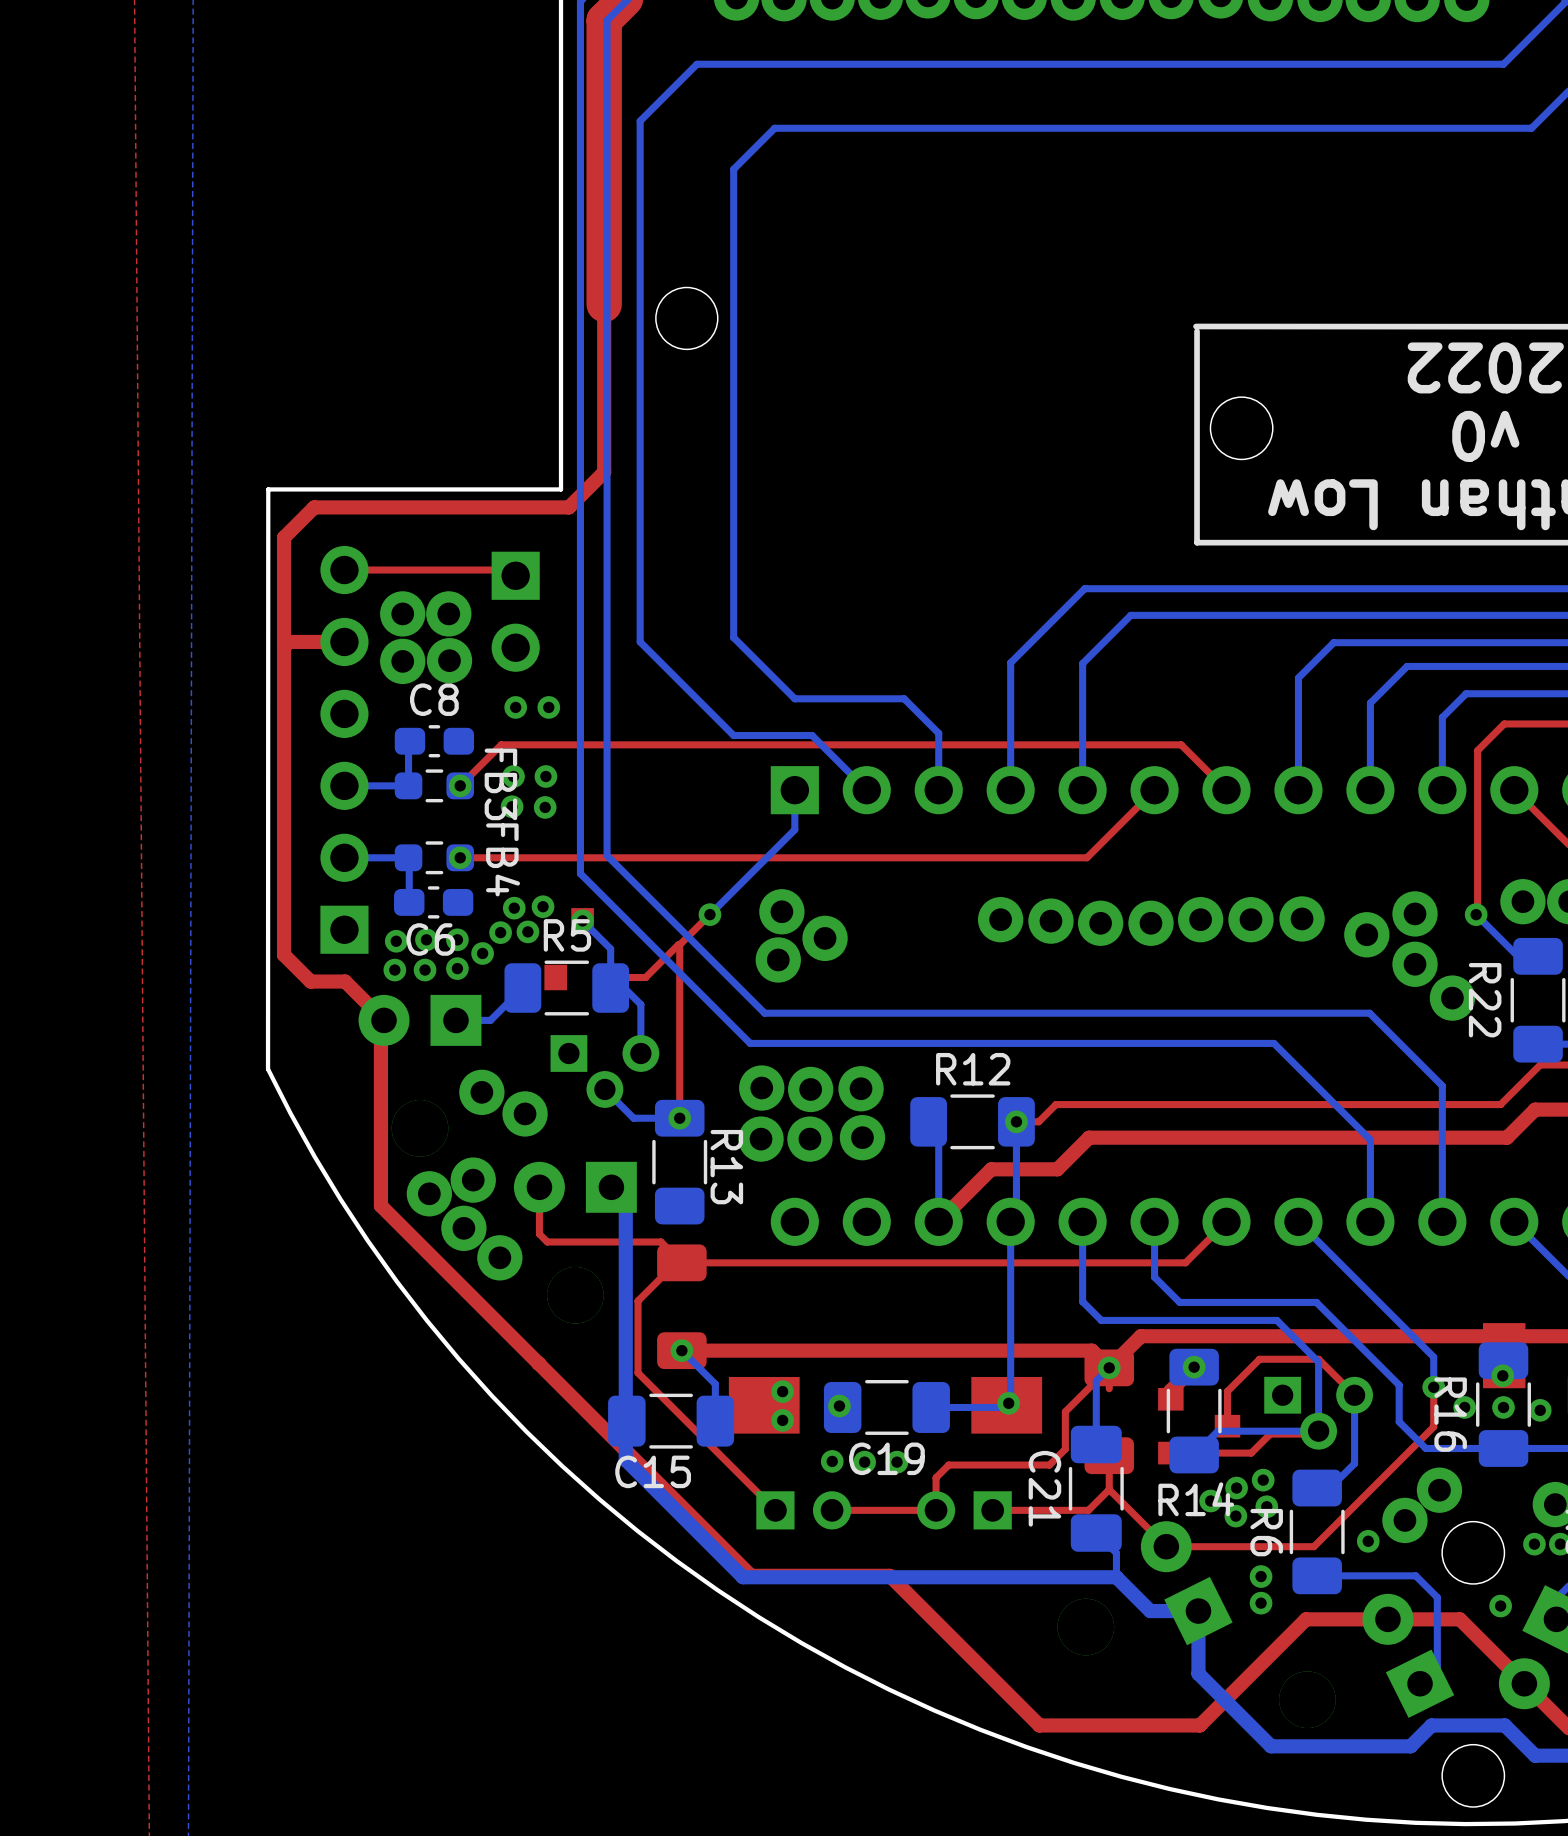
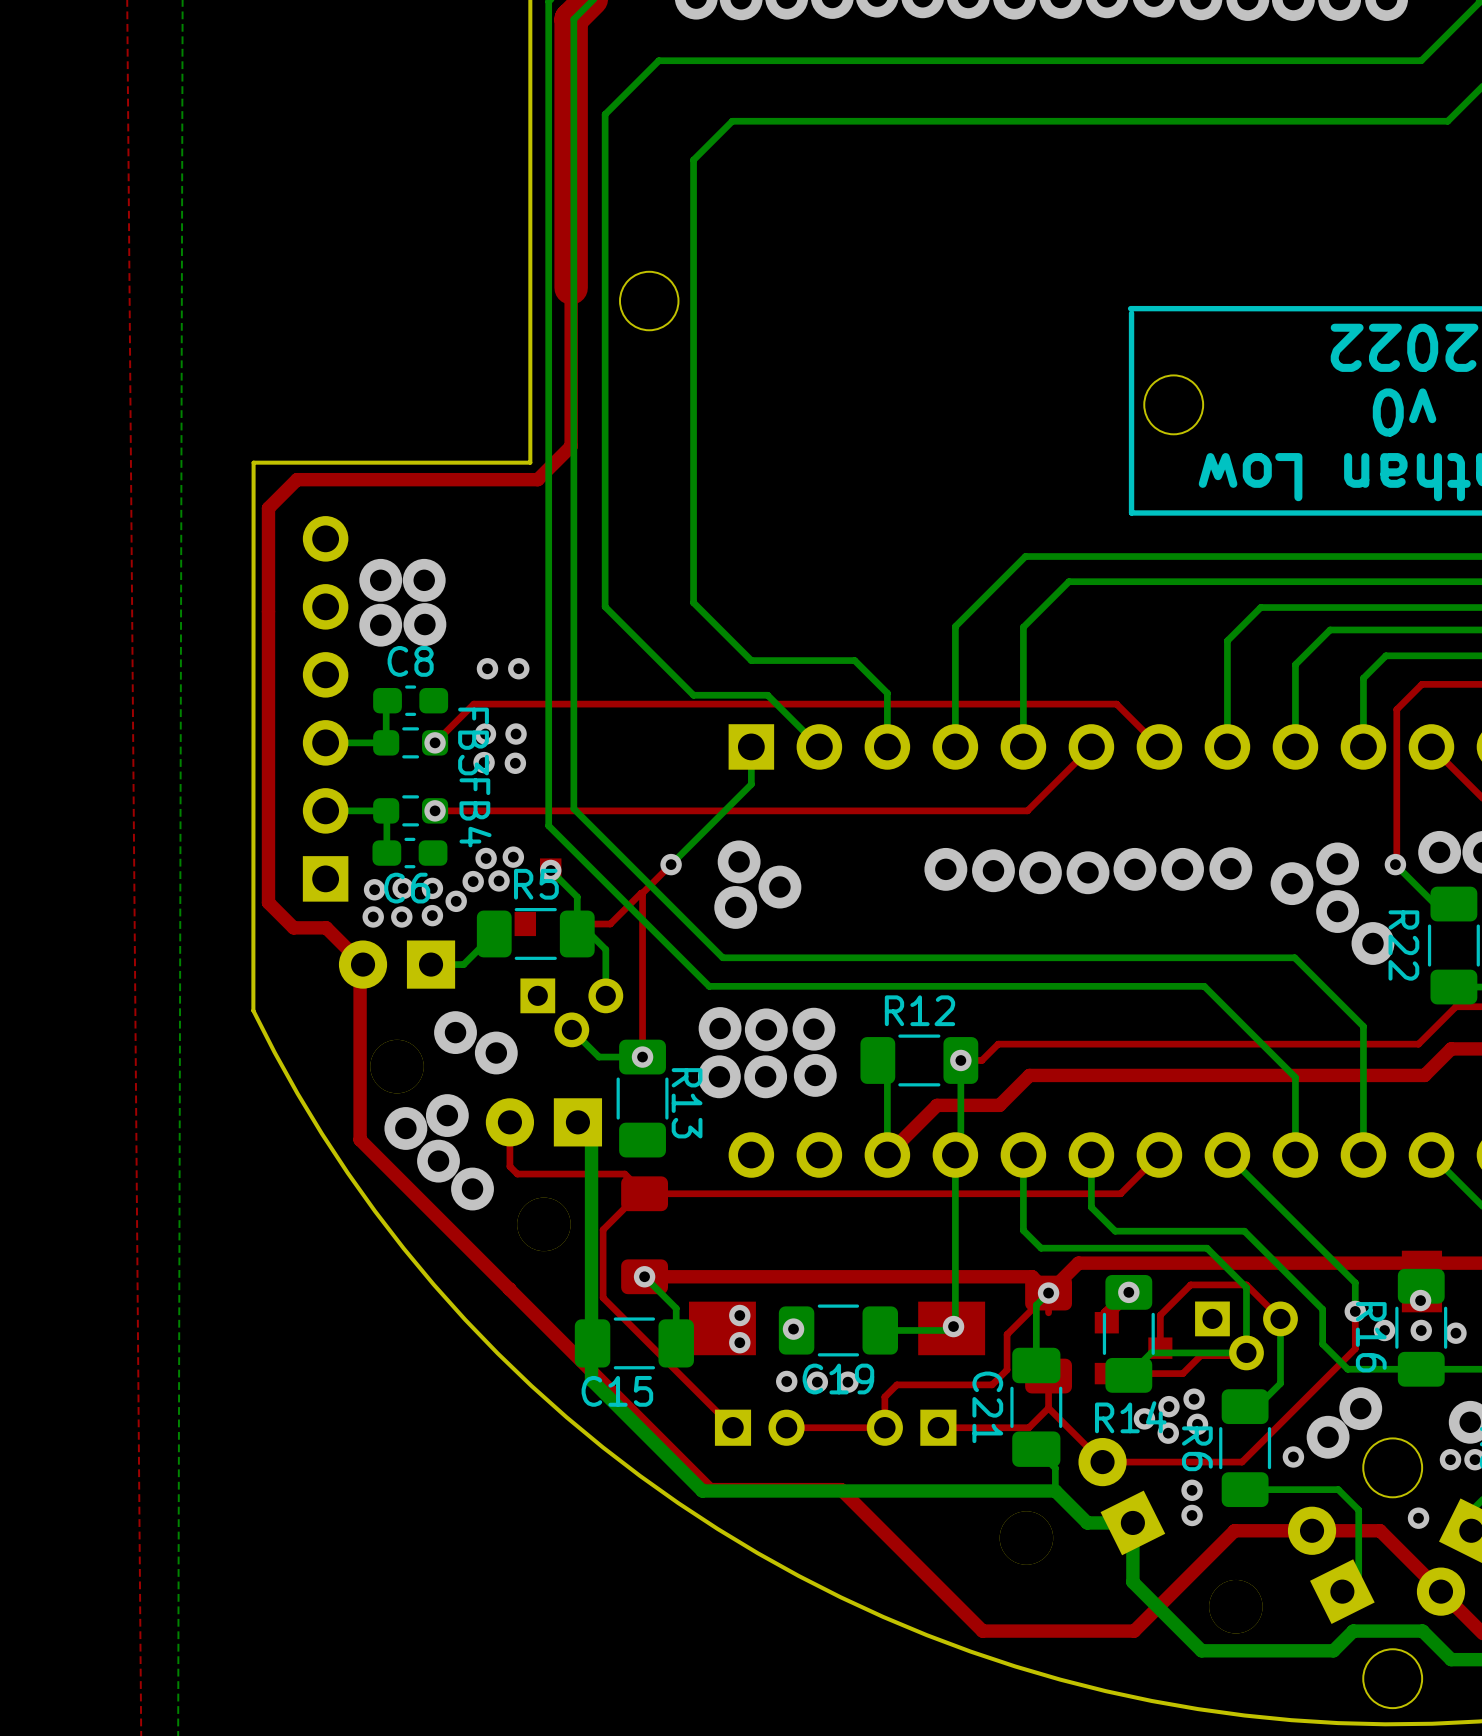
top track: (344, 570) (509, 570) (515, 575) -> none
part: (515, 611) -> none
top track: (344, 641) (289, 641) (284, 647) -> none

